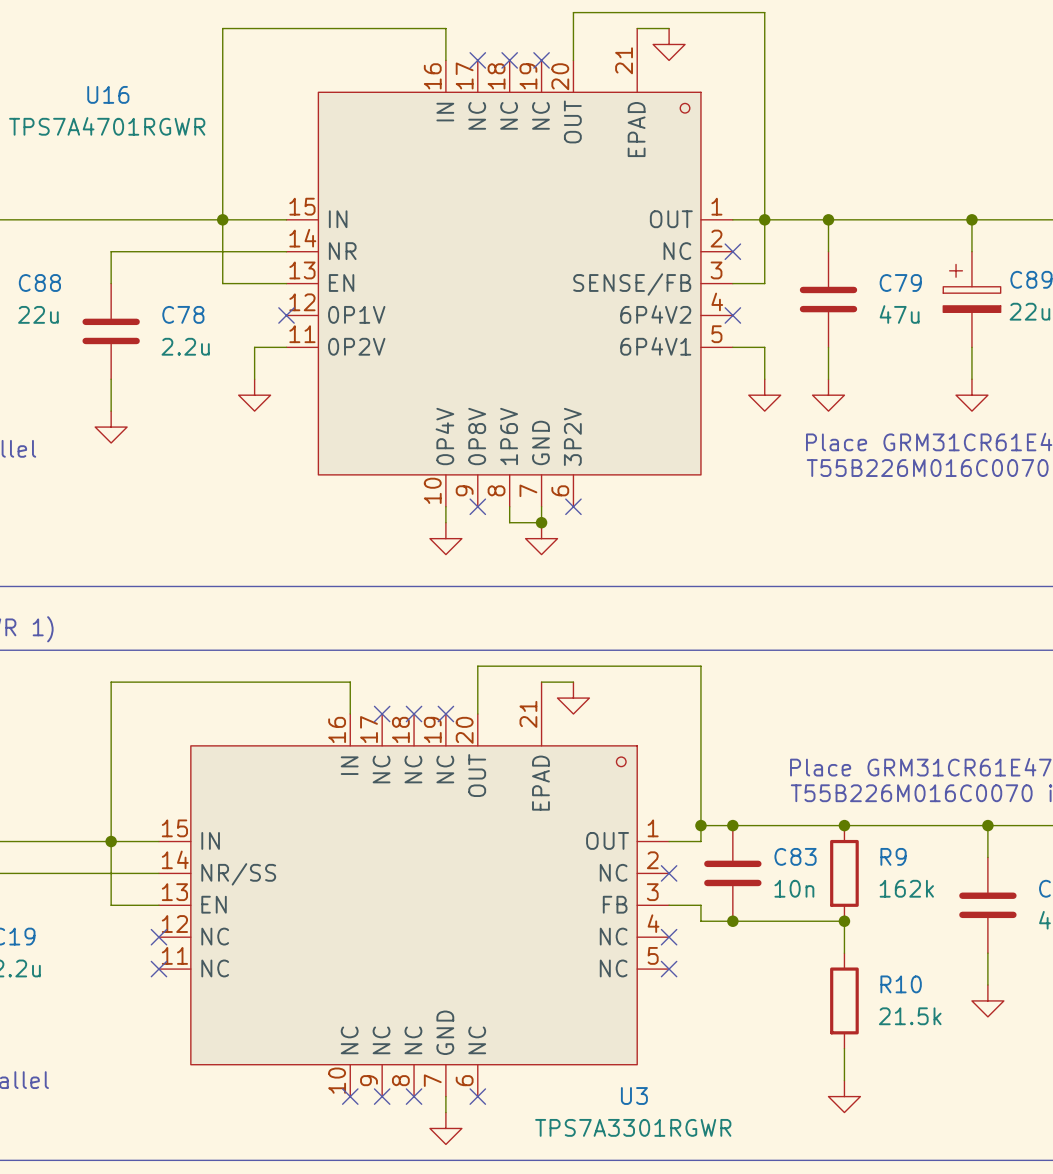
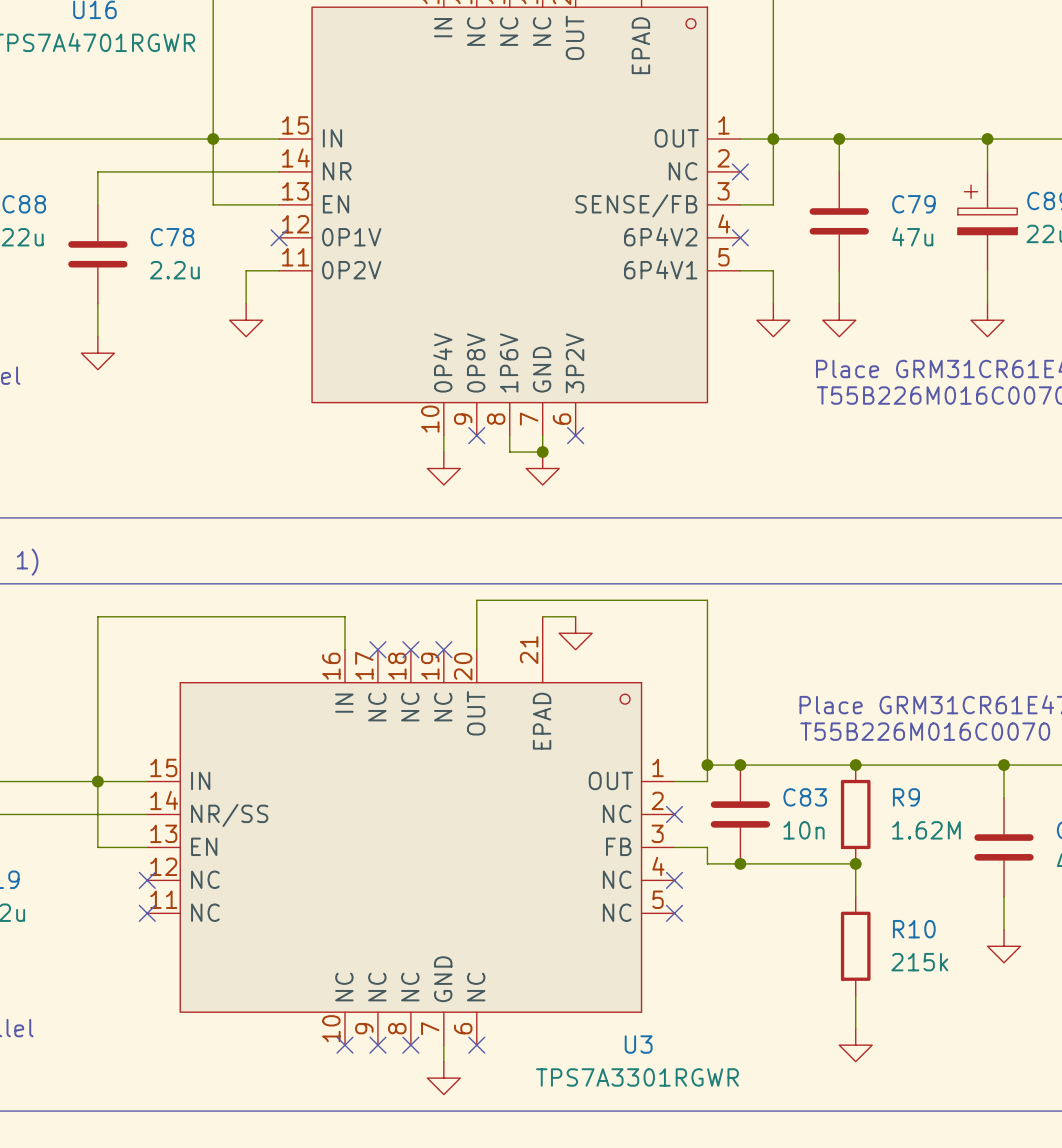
R9 value: 162k (906, 888) -> 1.62M (926, 830)
R10 value: 21.5k (910, 1016) -> 215k (919, 962)

